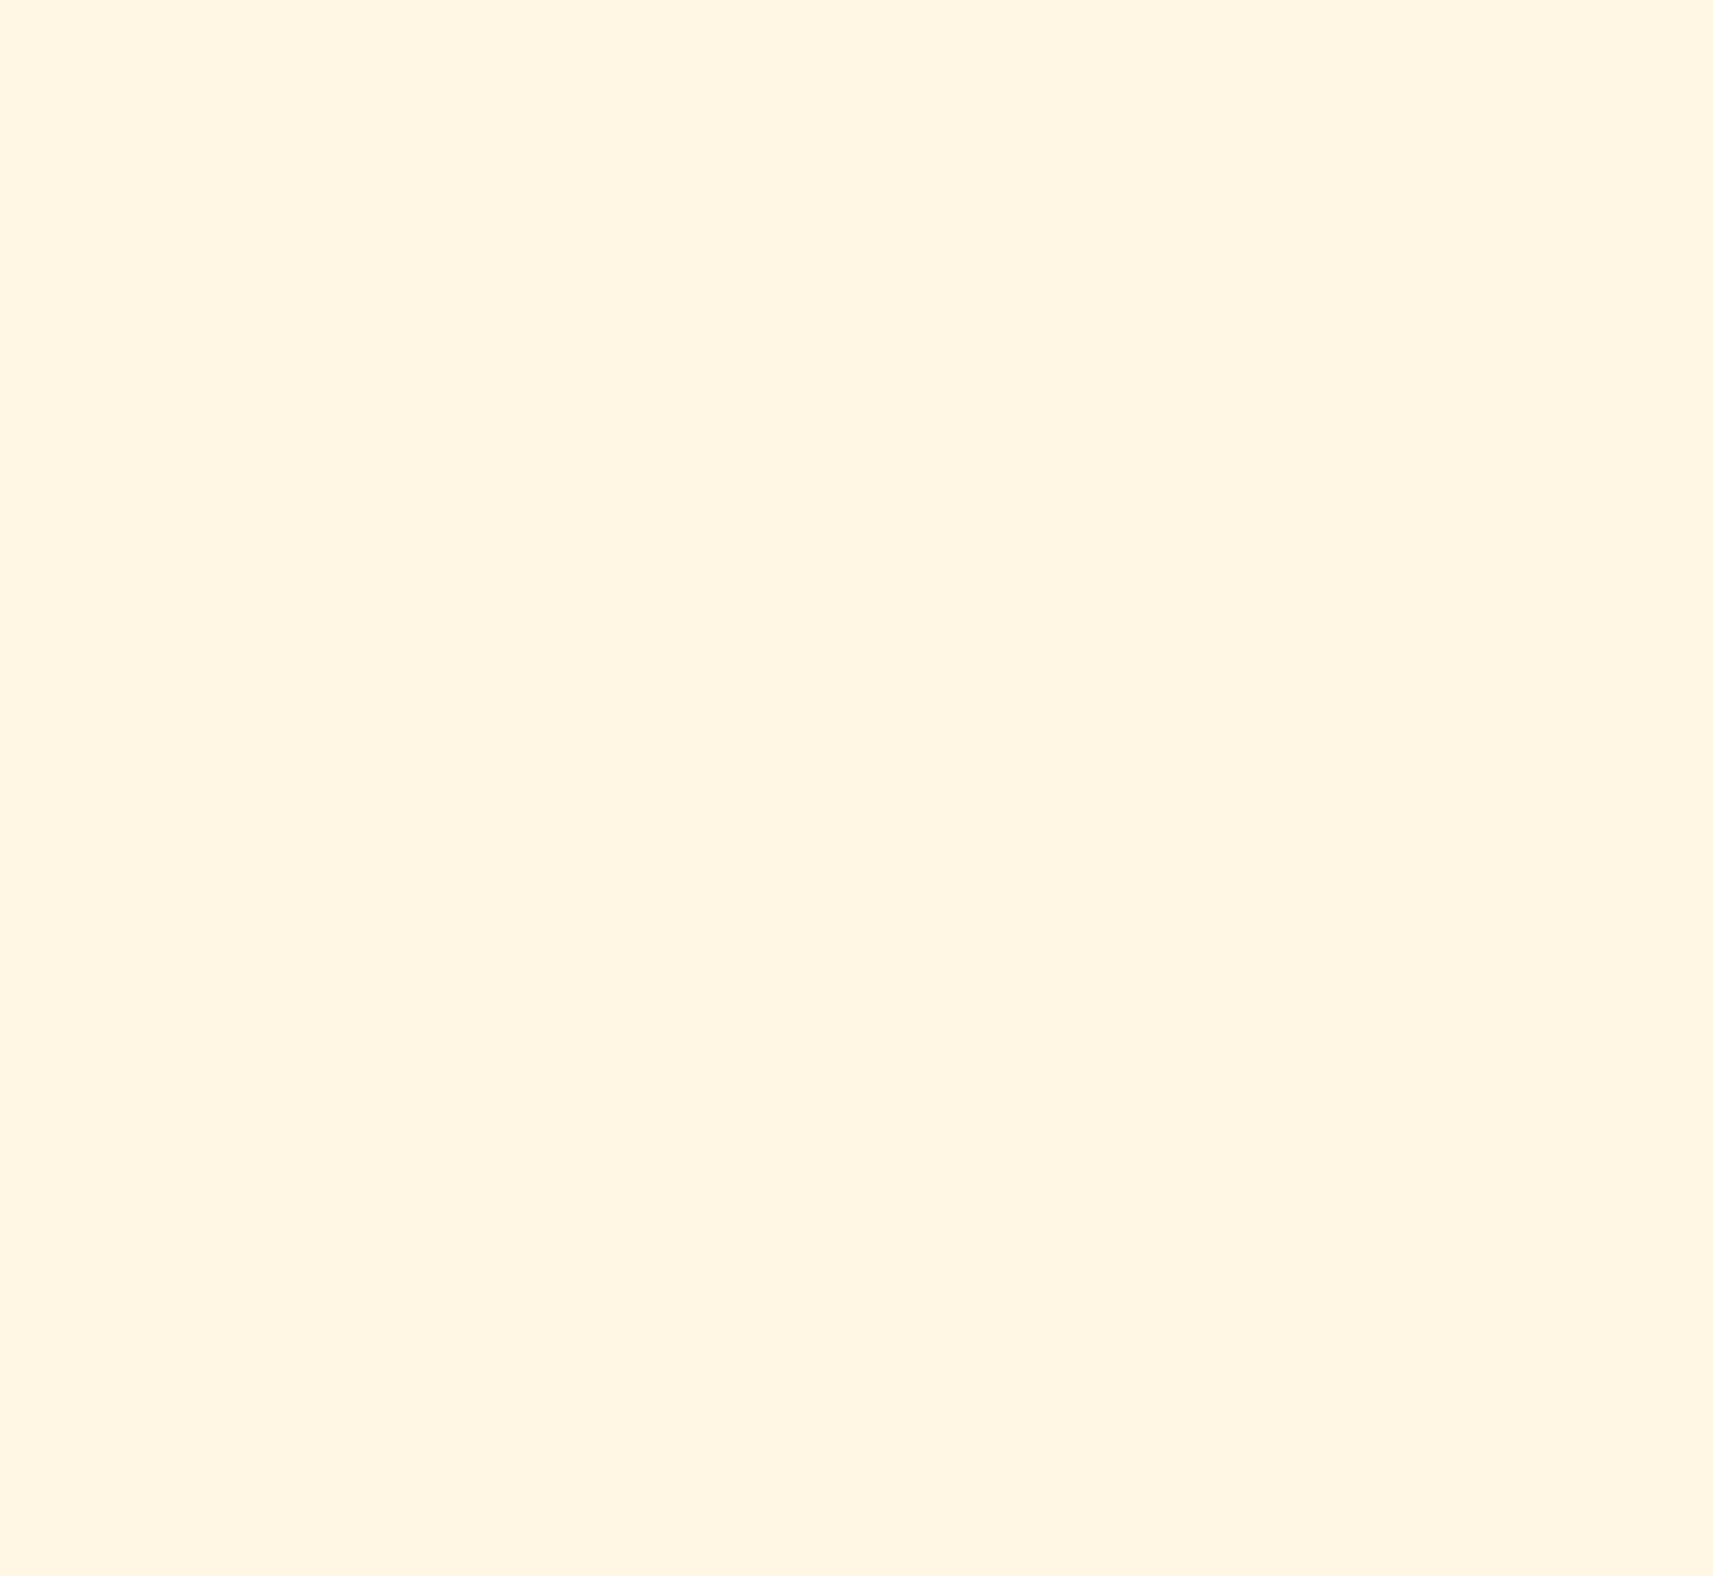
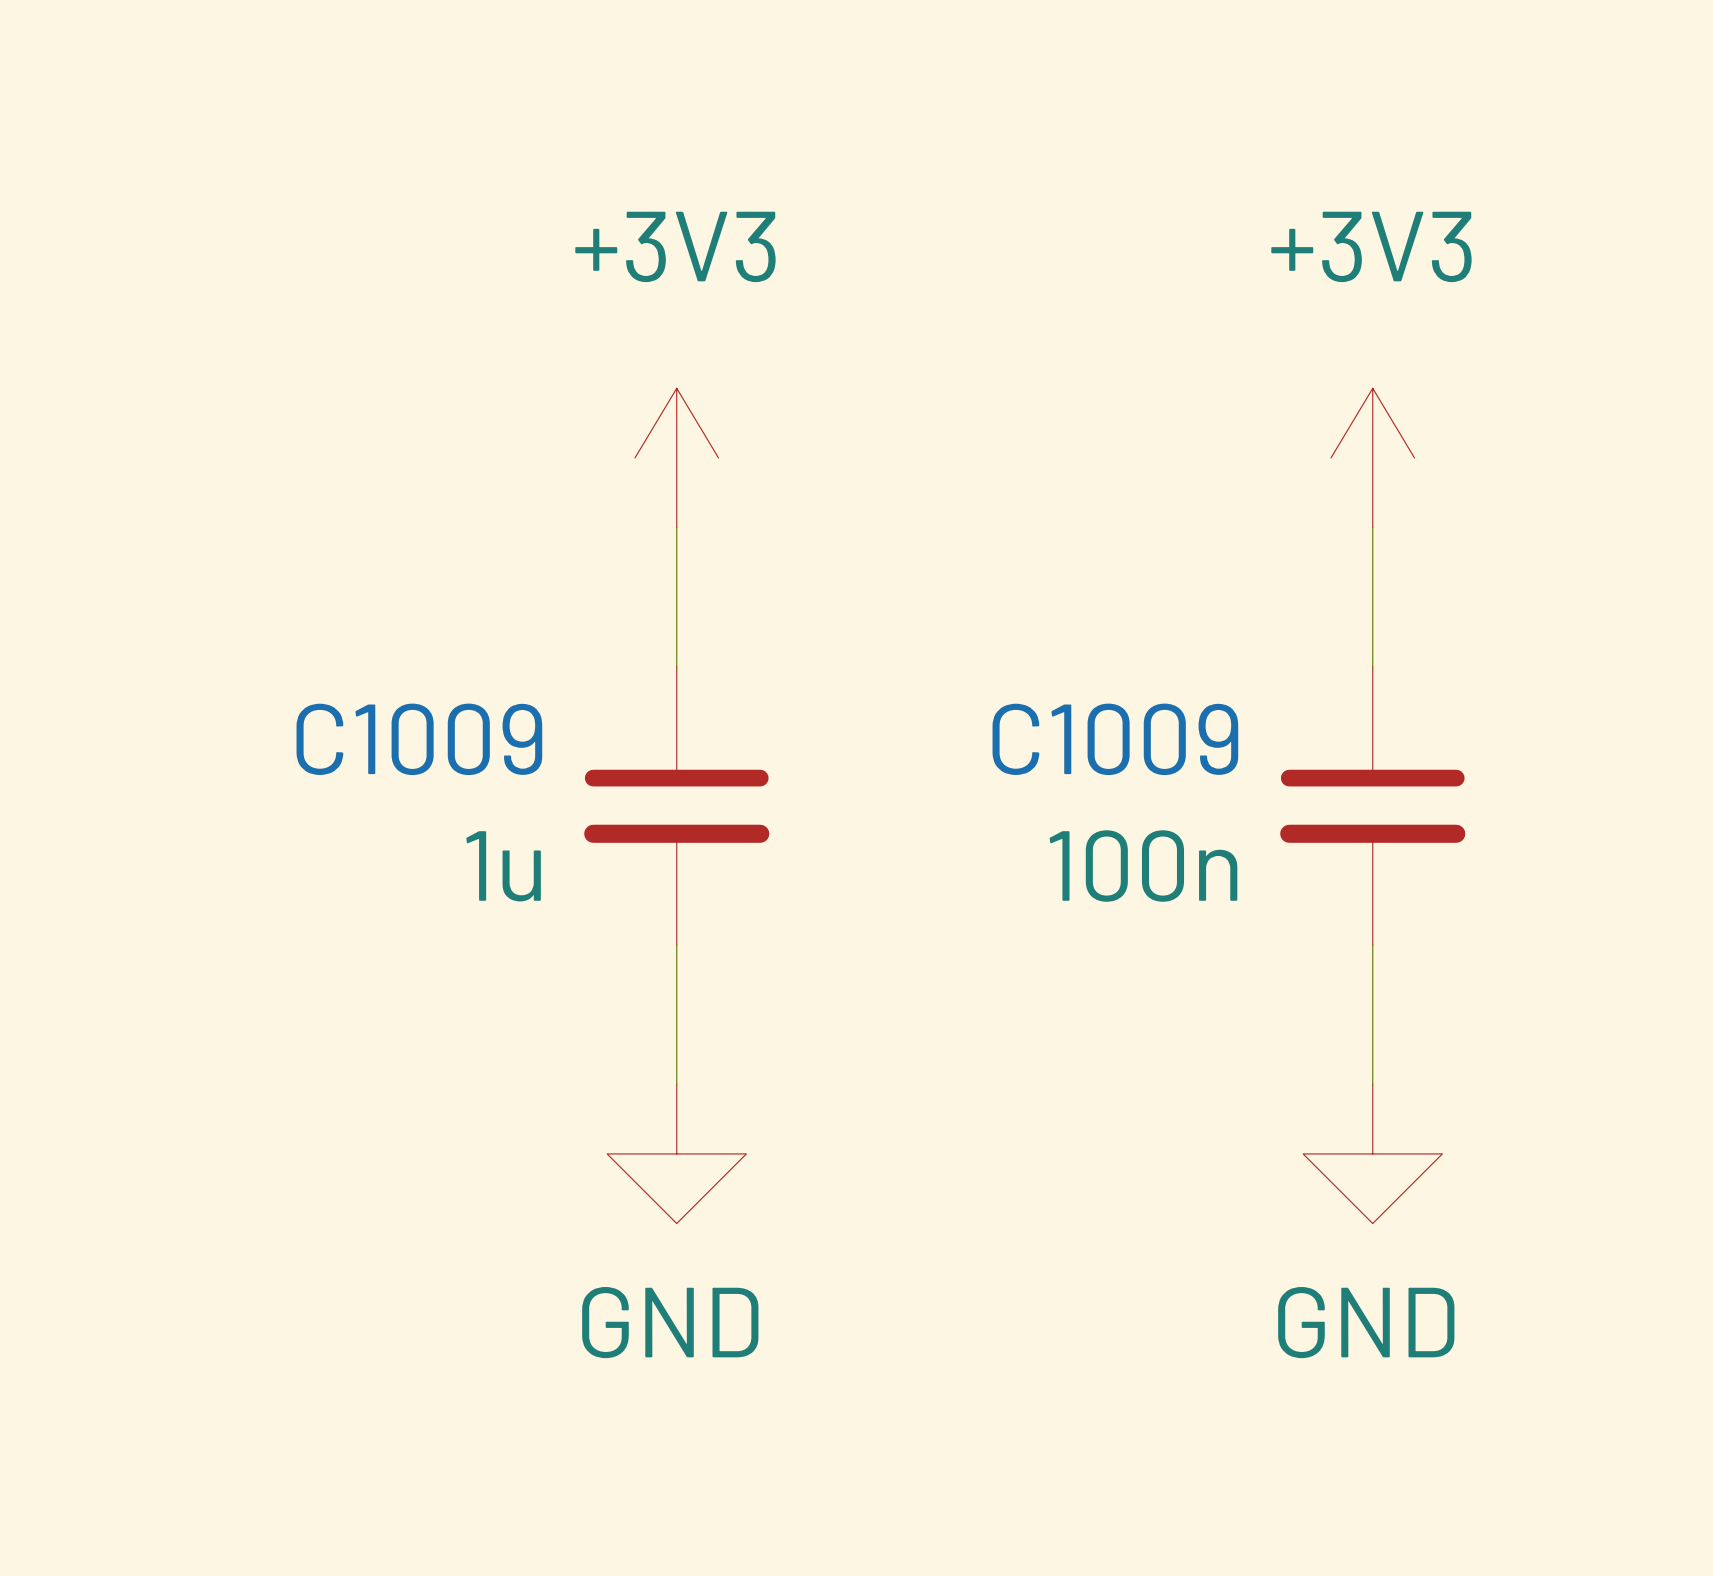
power symbol: none -> +3V3 (676, 457)
power symbol: none -> +3V3 (1372, 457)
wire: none -> (676, 527) (676, 666)
wire: none -> (1372, 527) (1372, 666)
C1009: none -> 1u (676, 805)
C1009: none -> 100n (1372, 805)
wire: none -> (676, 945) (676, 1084)
wire: none -> (1372, 945) (1372, 1084)
power symbol: none -> GND (676, 1153)
power symbol: none -> GND (1372, 1153)

